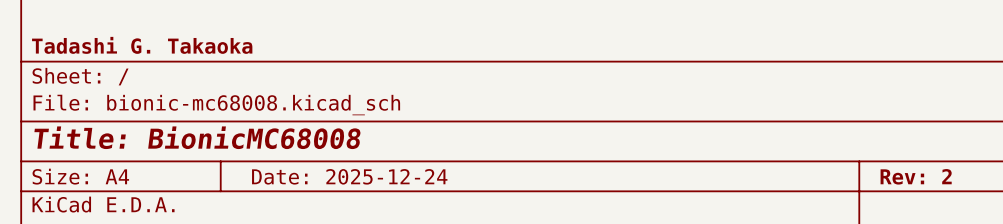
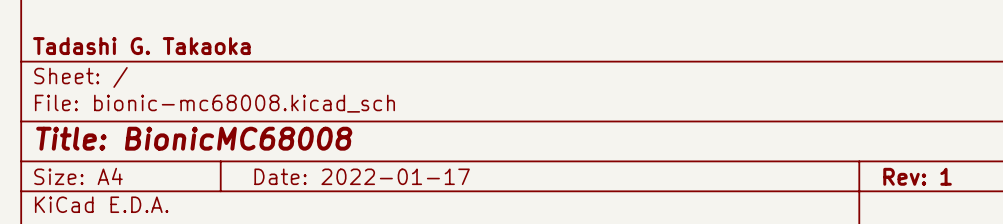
title block: Date: 2025-12-24 (349, 176) -> Date: 2022-01-17 (362, 176)
title block: Rev: 2 (916, 176) -> Rev: 1 (917, 176)

